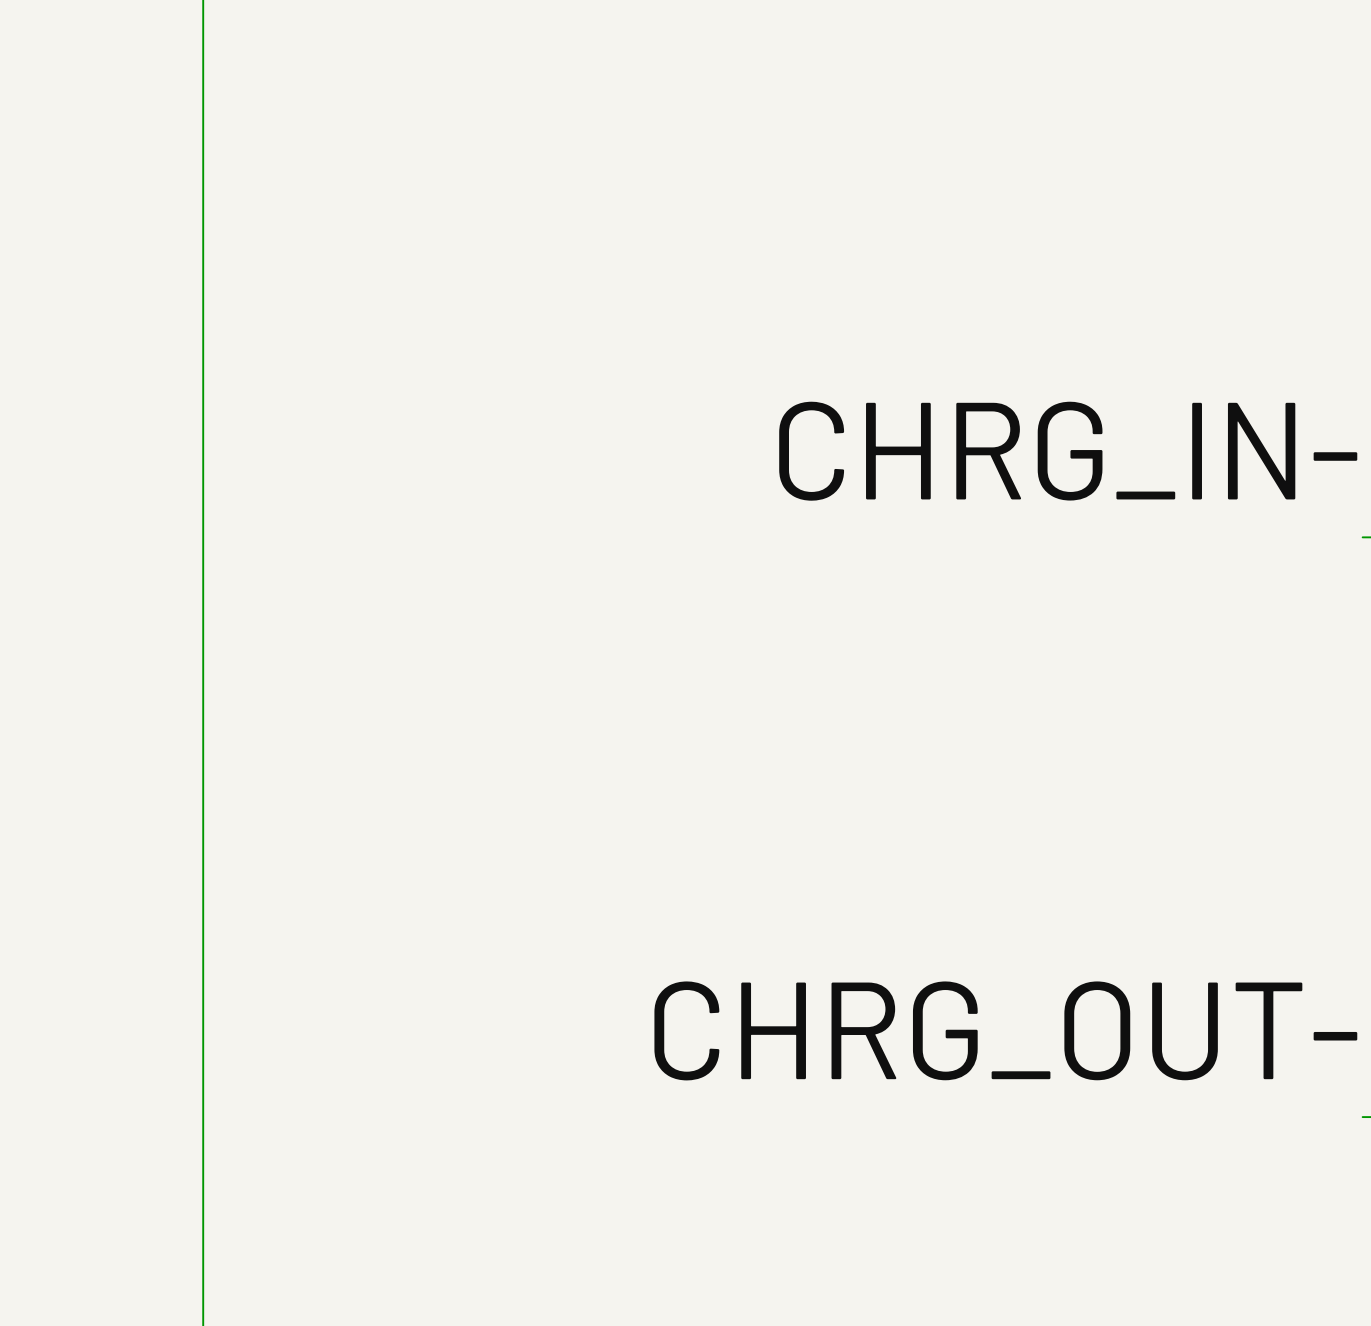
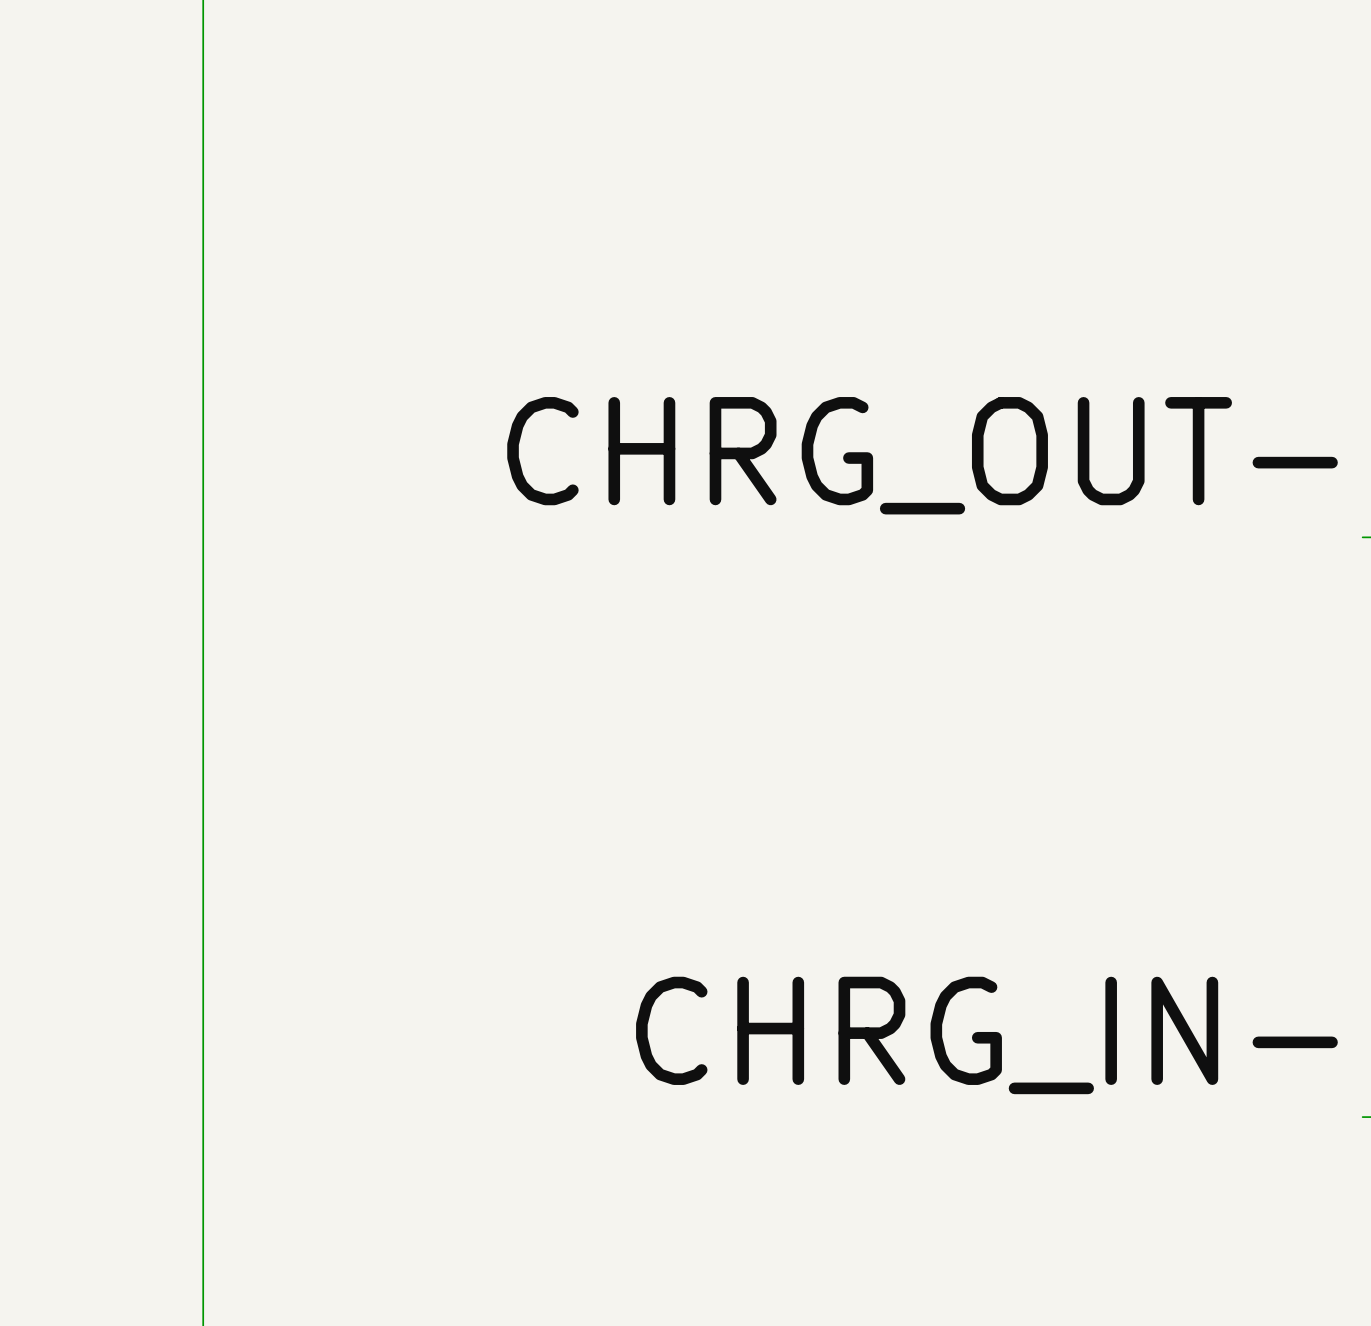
label: CHRG_IN- (1068, 451) -> CHRG_OUT- (922, 455)
label: CHRG_OUT- (1005, 1030) -> CHRG_IN- (986, 1035)

